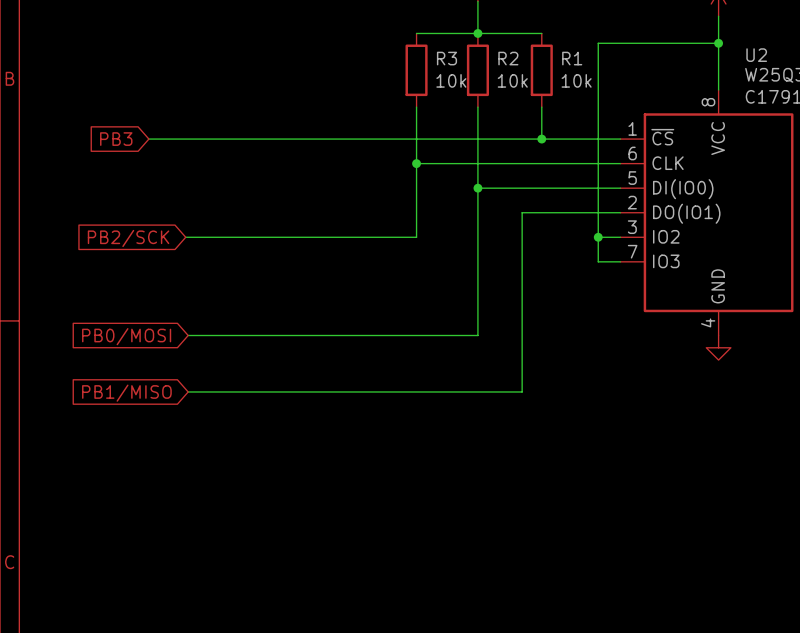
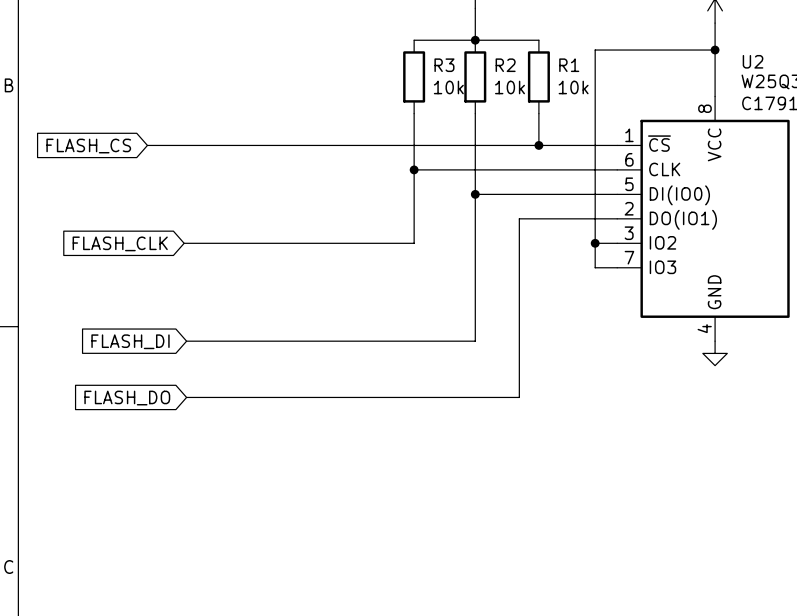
global label: PB3 (116, 139) -> FLASH_CS (88, 146)
global label: PB2/SCK (128, 238) -> FLASH_CLK (120, 243)
global label: PB0/MOSI (126, 336) -> FLASH_DI (130, 341)
global label: PB1/MISO (126, 393) -> FLASH_DO (127, 398)

